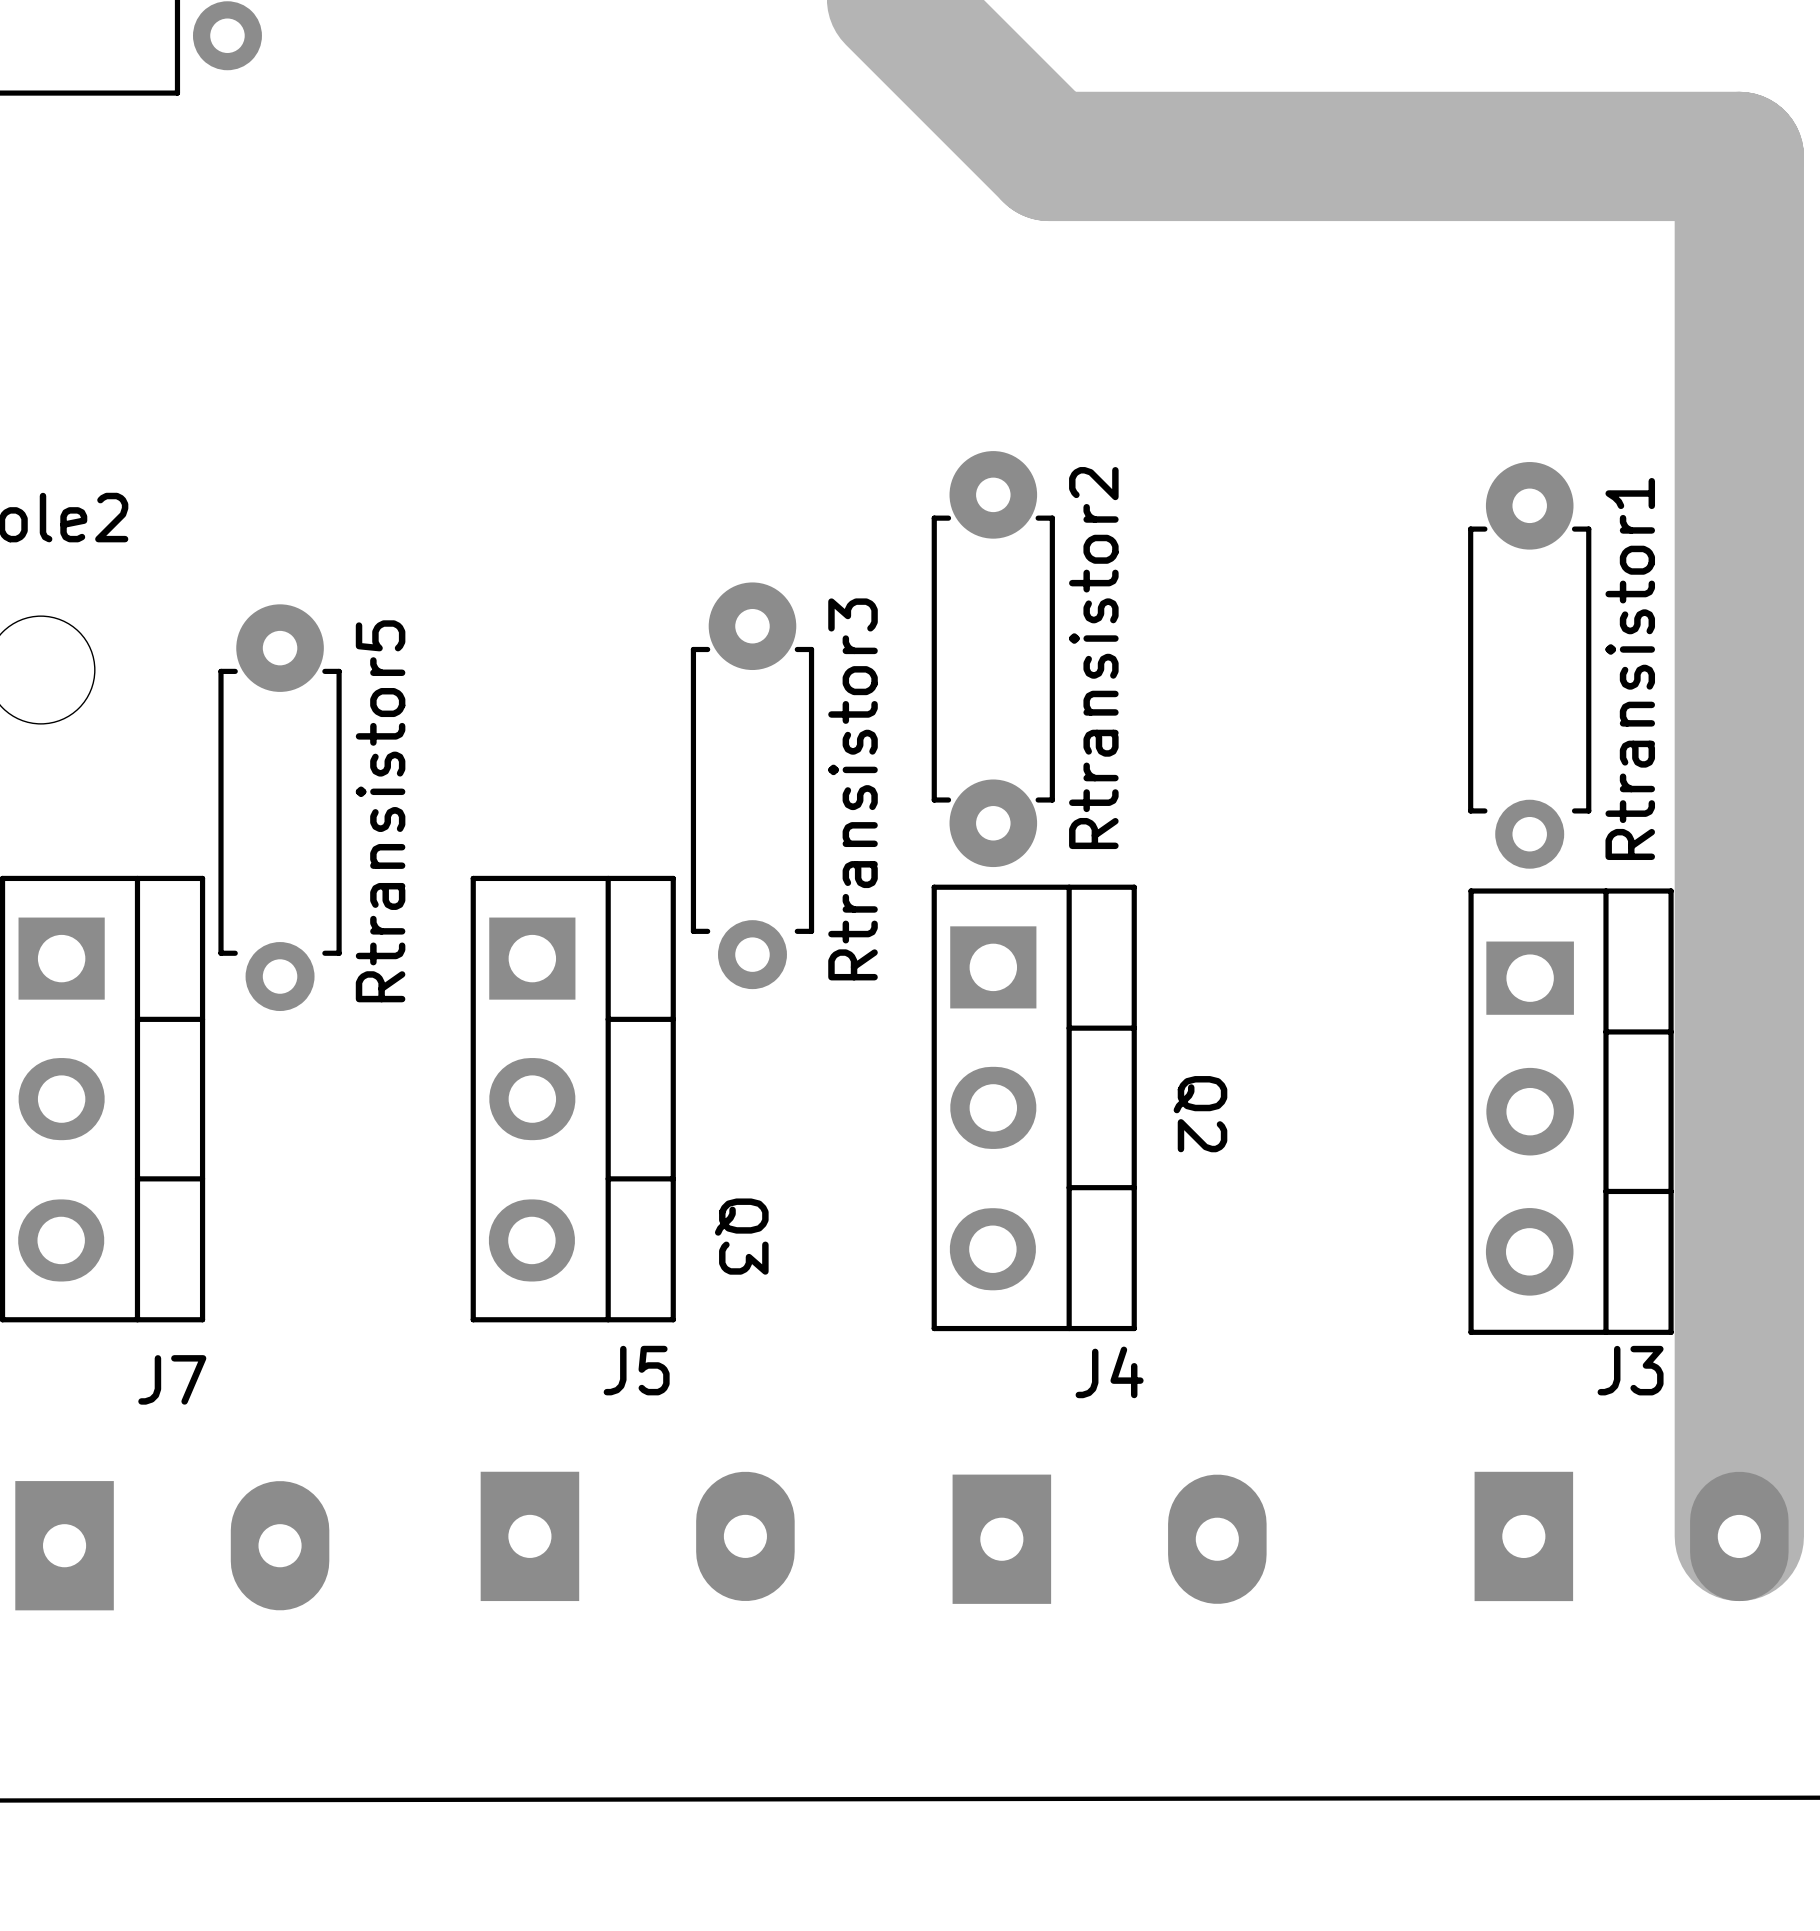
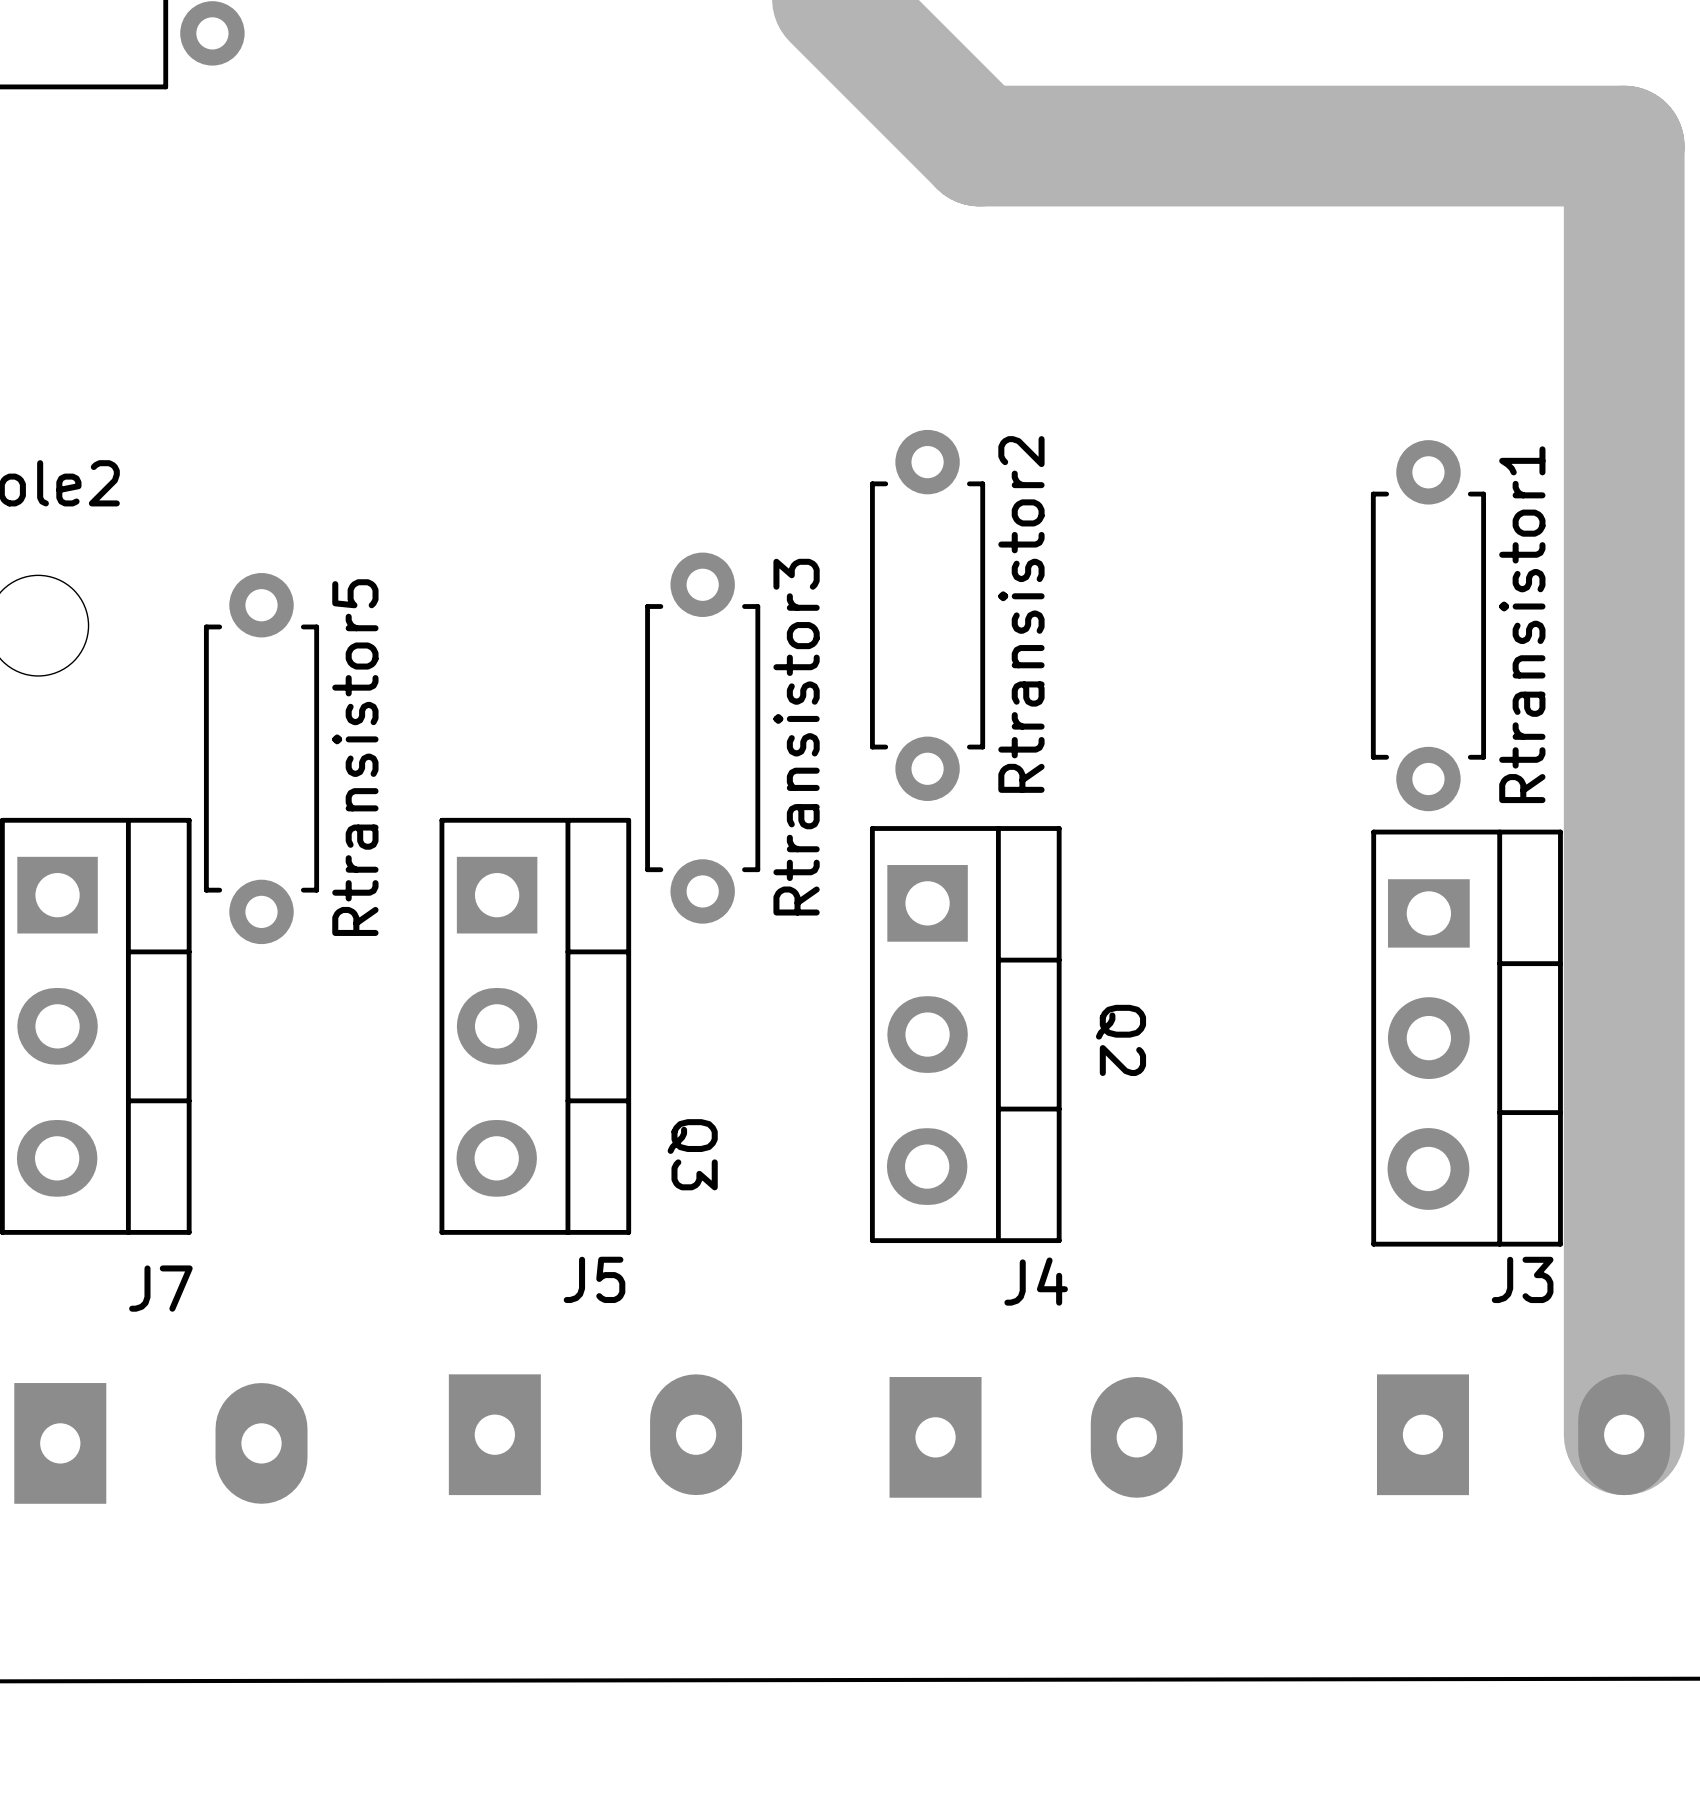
Rtransistor2 footprint: [931, 451, 1055, 868] -> [870, 429, 986, 801]
Rtransistor1 footprint: [1468, 462, 1592, 869] -> [1370, 440, 1487, 812]
Rtransistor3 footprint: [690, 582, 815, 990] -> [645, 552, 761, 924]
Rtransistor5 footprint: [218, 604, 342, 1012] -> [203, 573, 320, 945]

